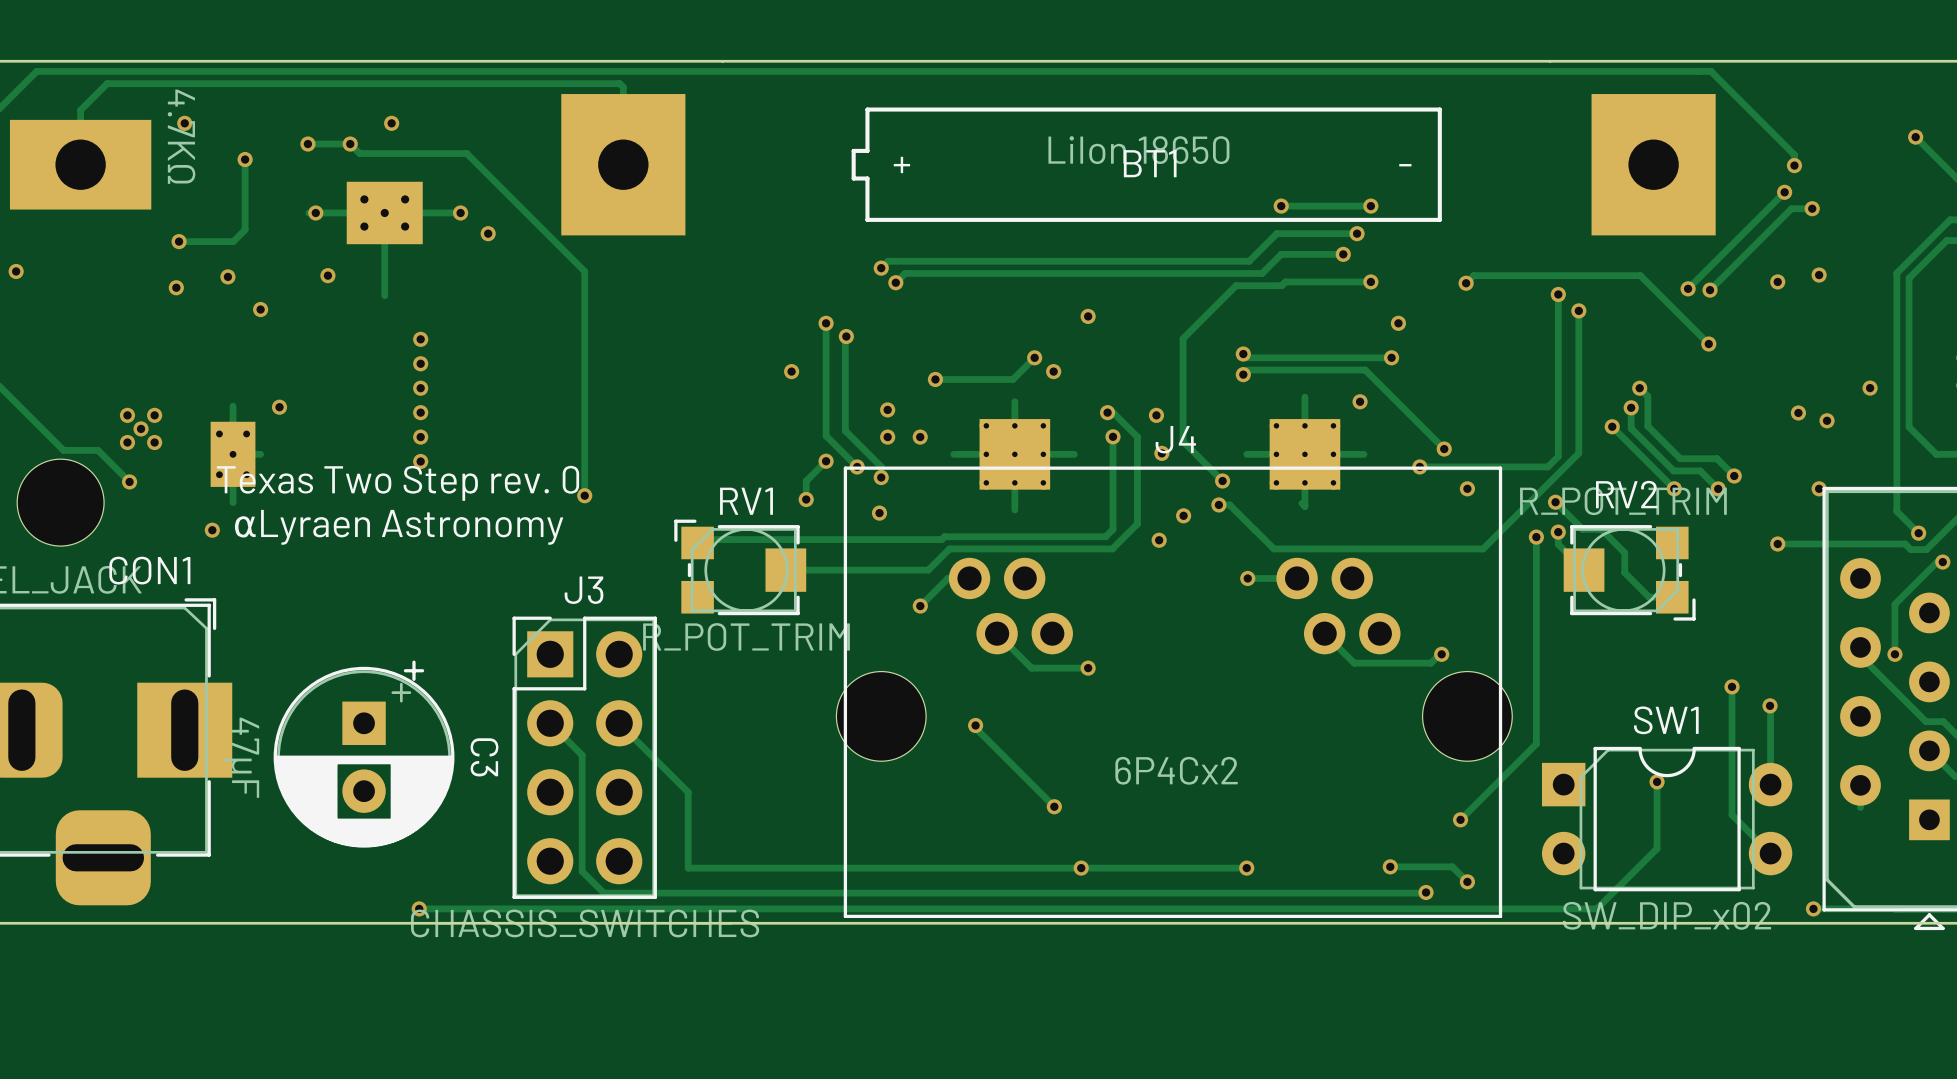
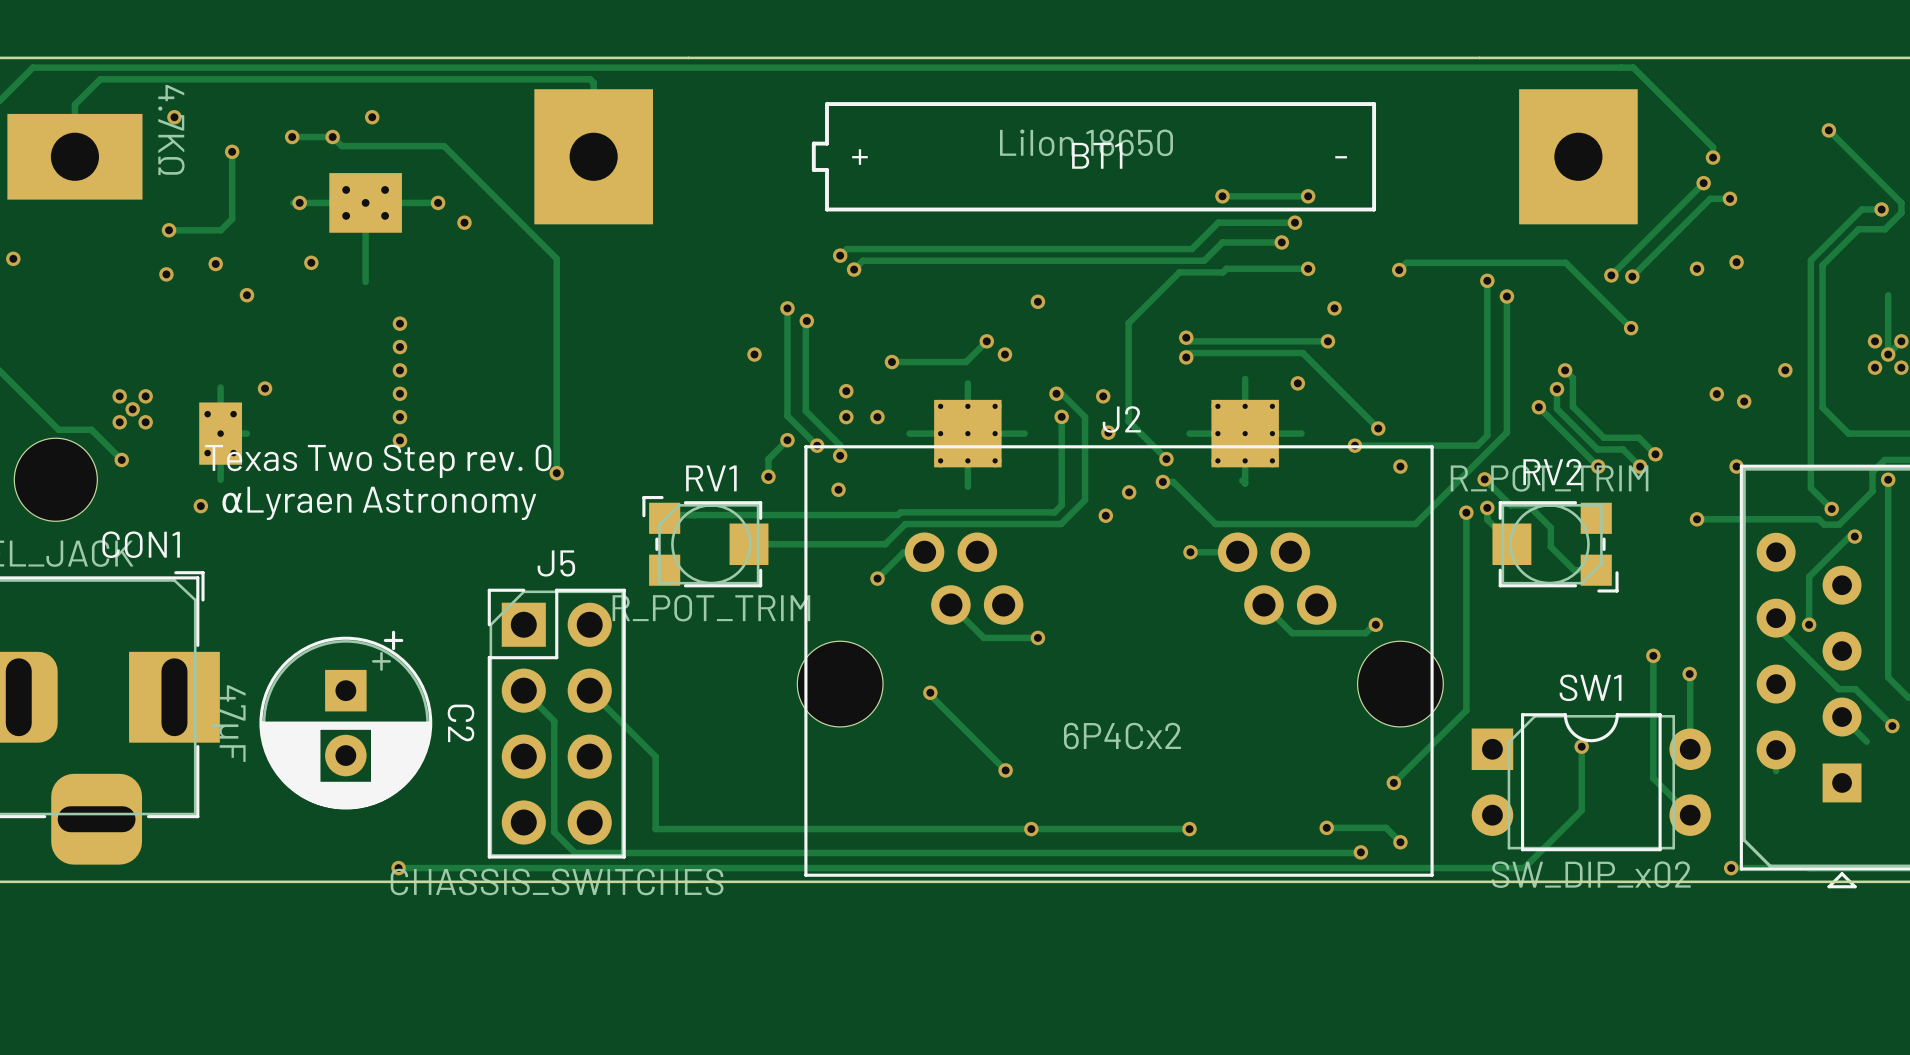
J4 name: J4 (1175, 439) -> J2 (1121, 419)
J3 name: J3 (584, 590) -> J5 (556, 563)
C3 name: C3 (484, 757) -> C2 (460, 723)

